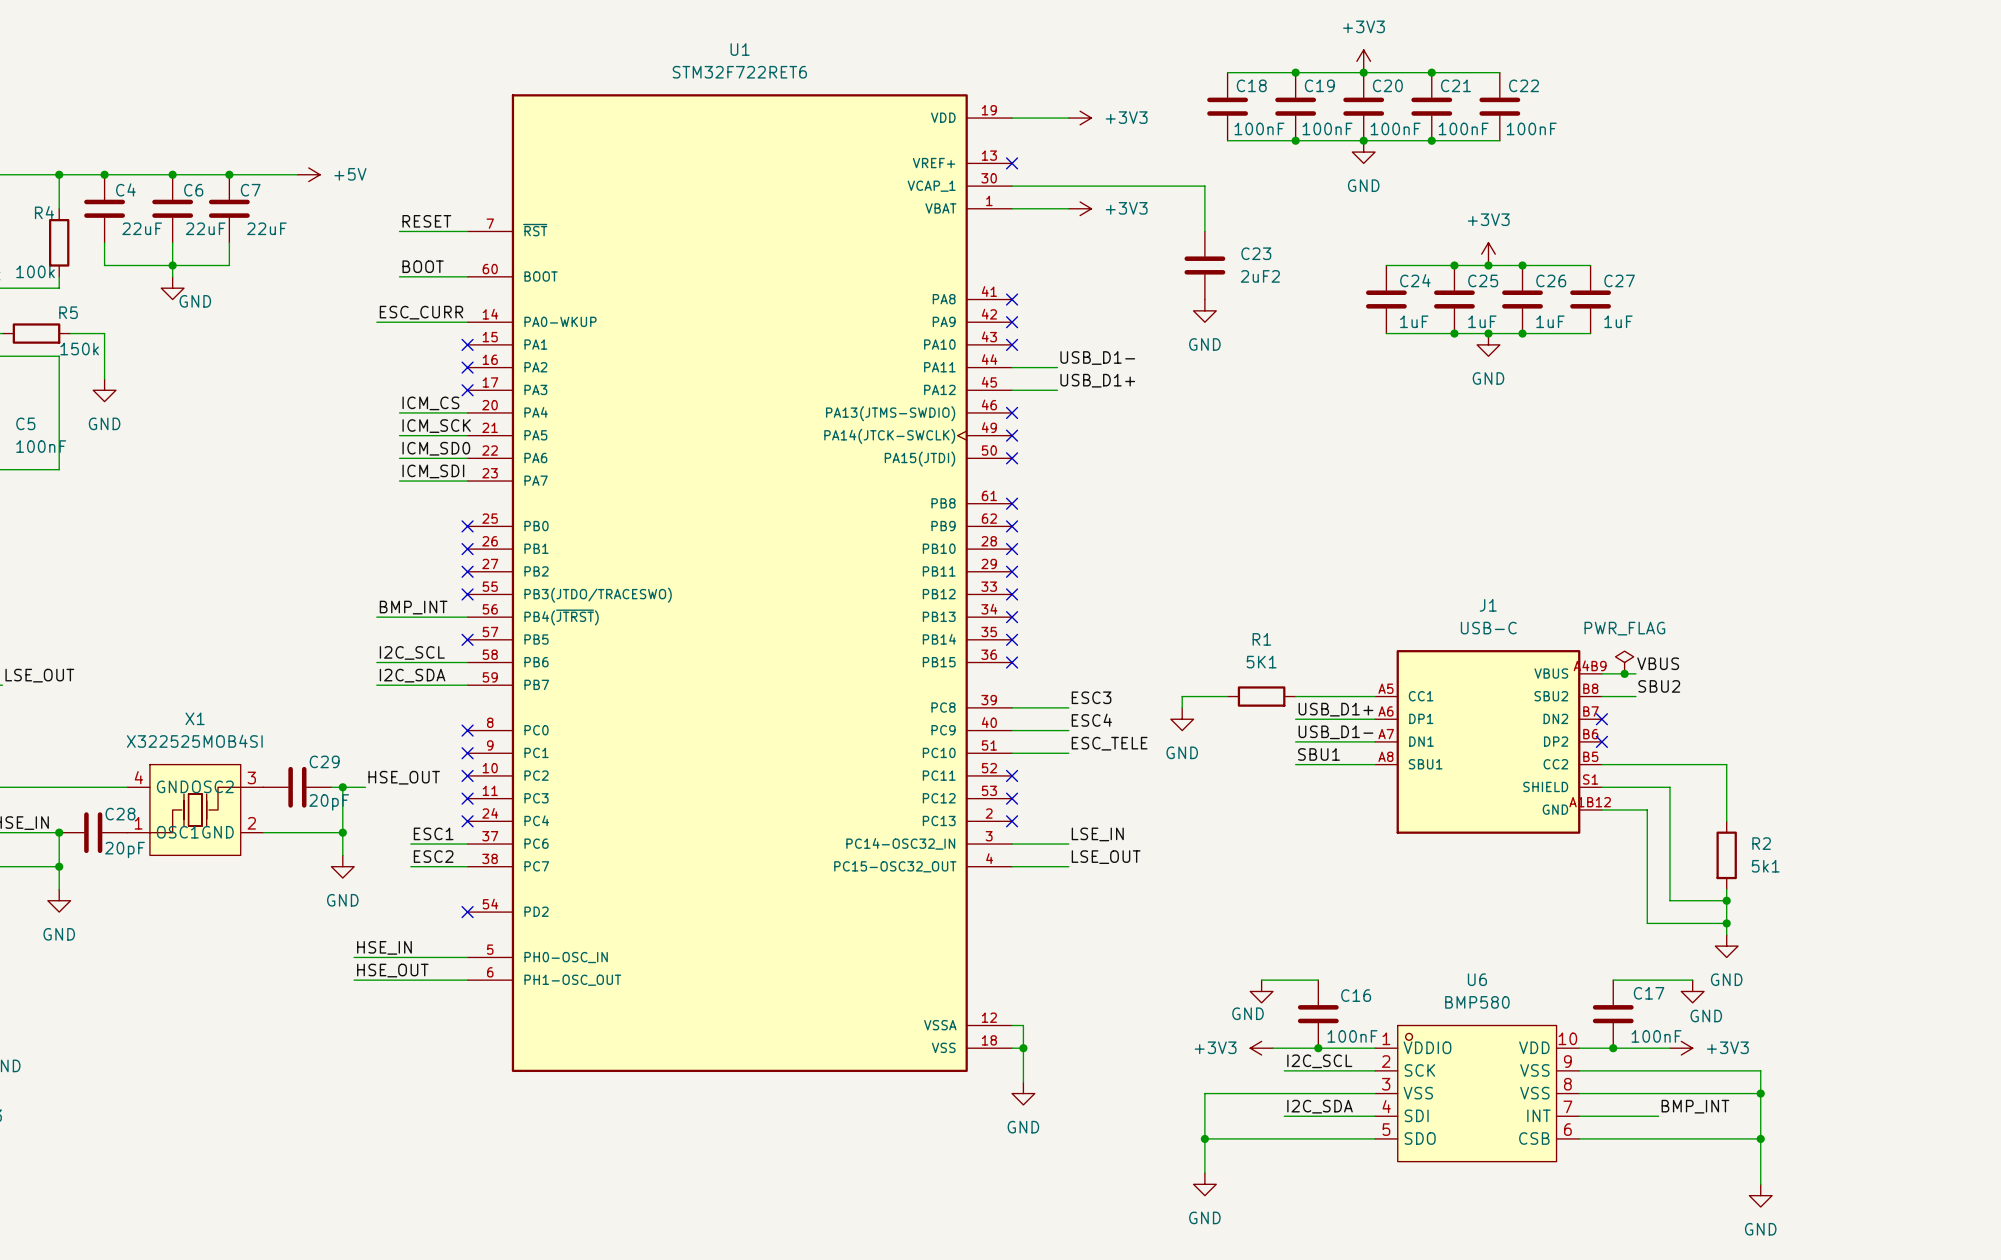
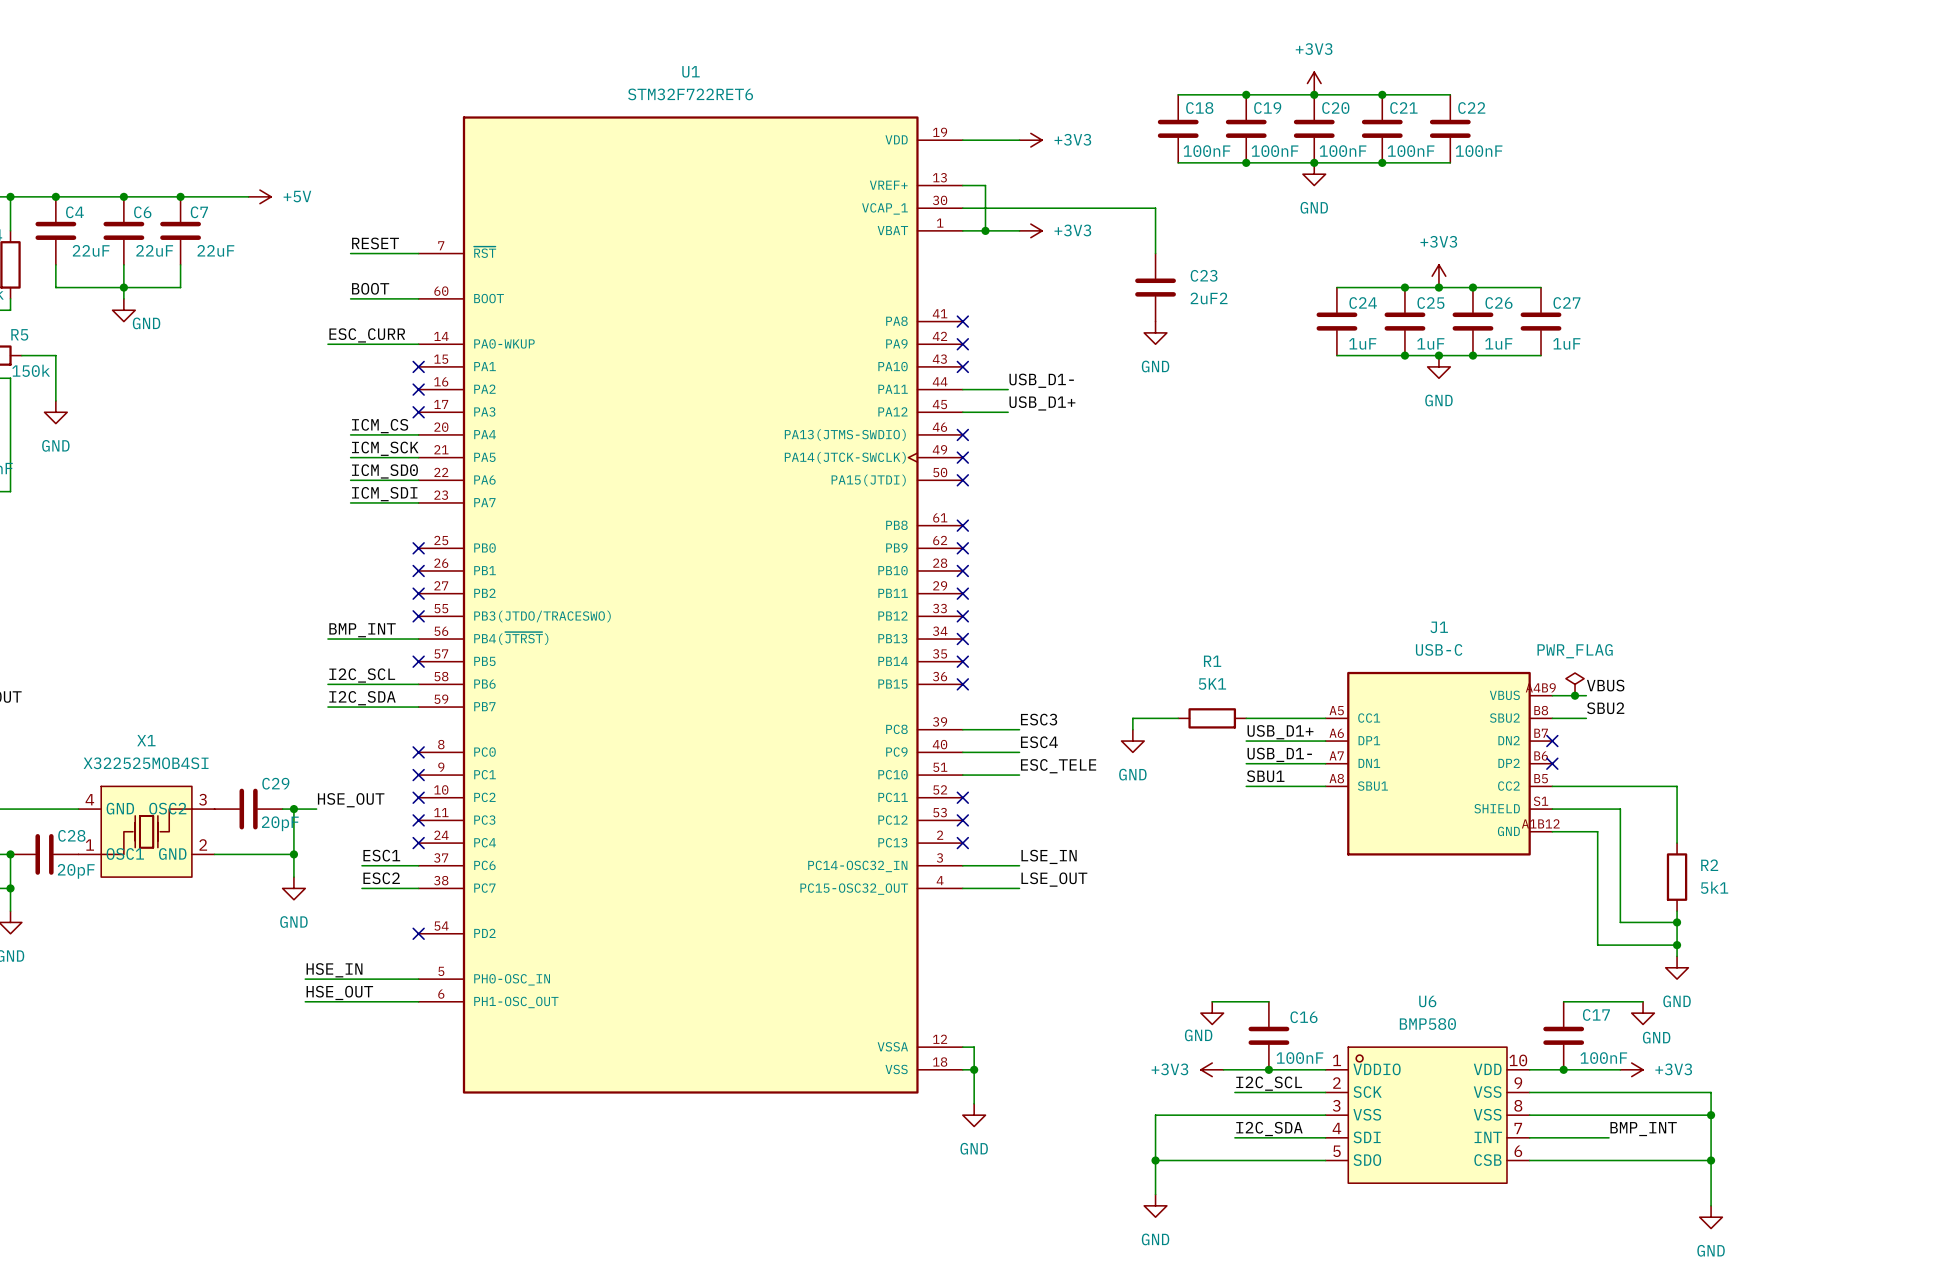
wire: none -> (962, 185) (985, 185) (985, 230)
no-connect mark: (1012, 163) -> none
junction: none -> (985, 230)

